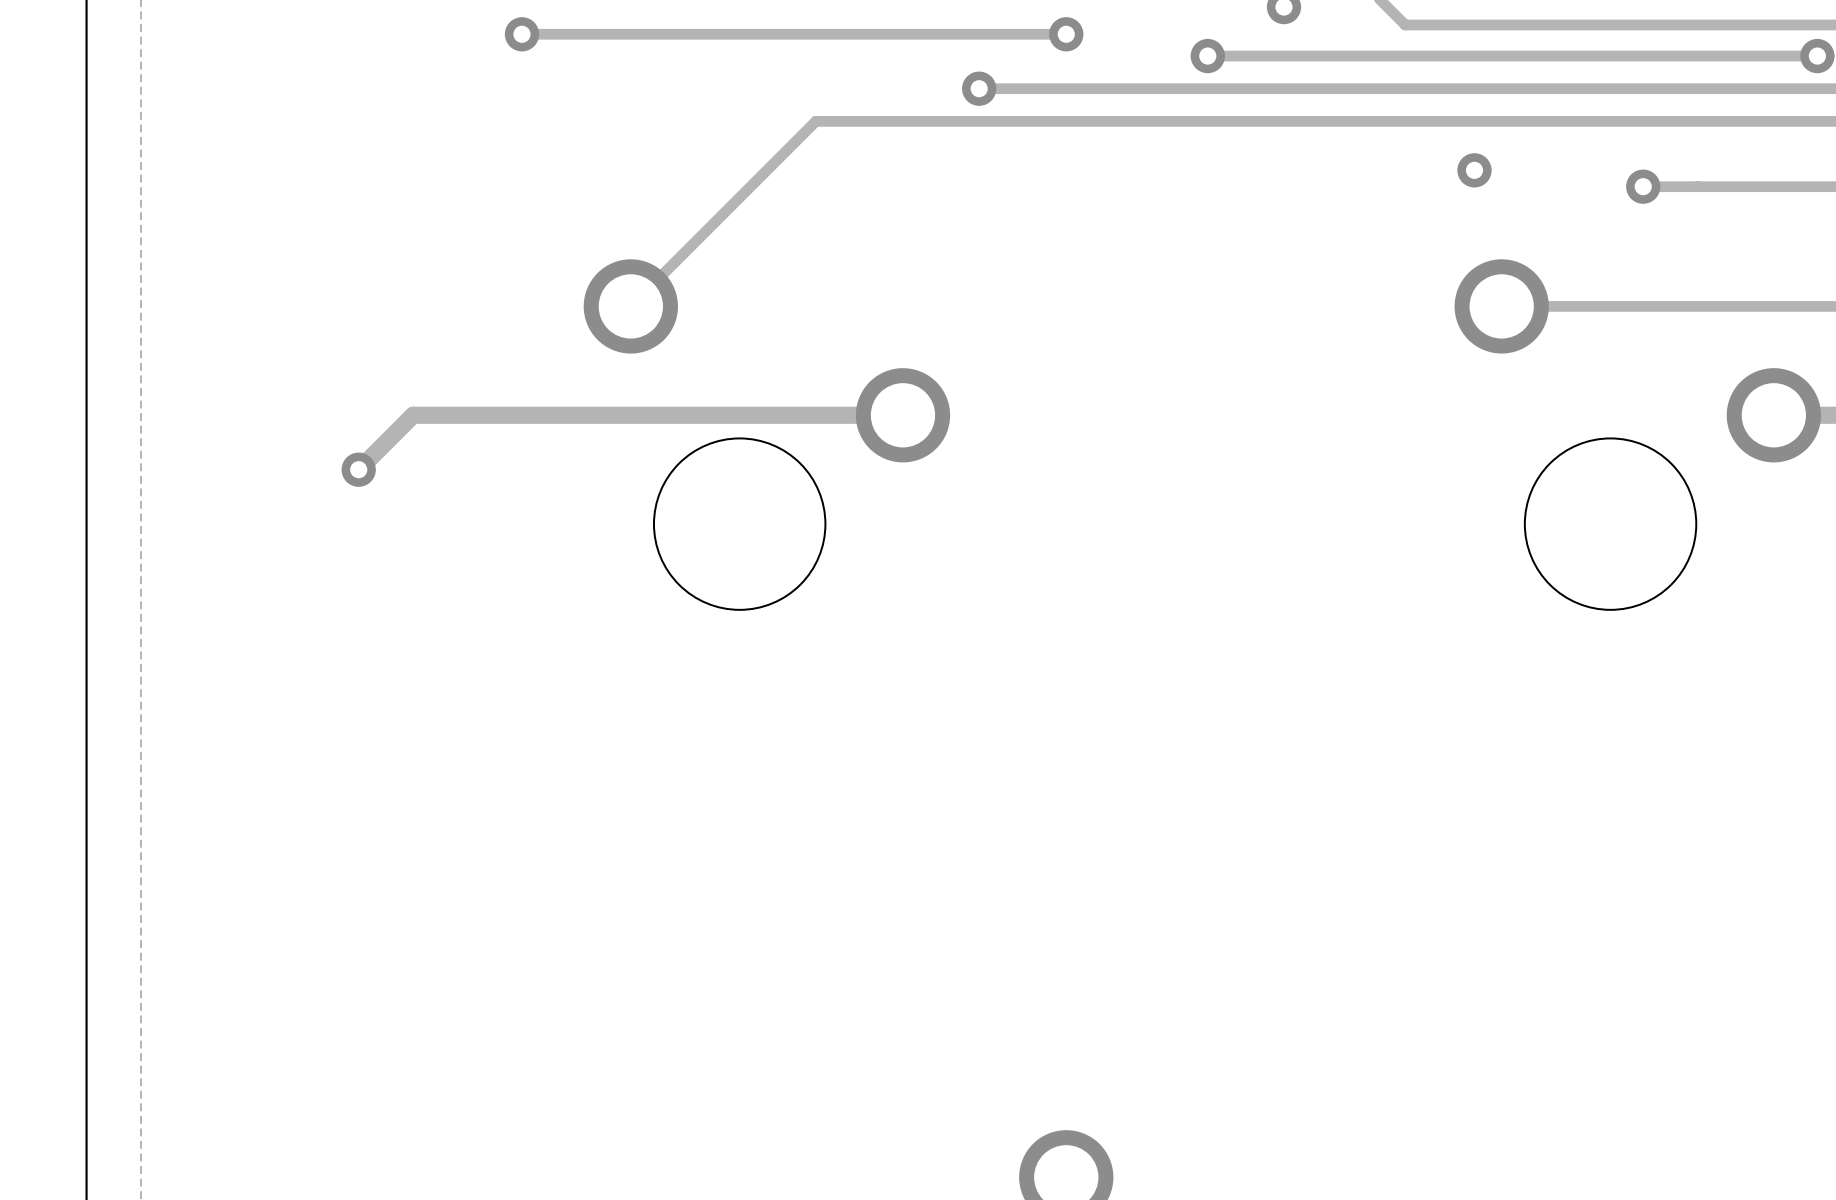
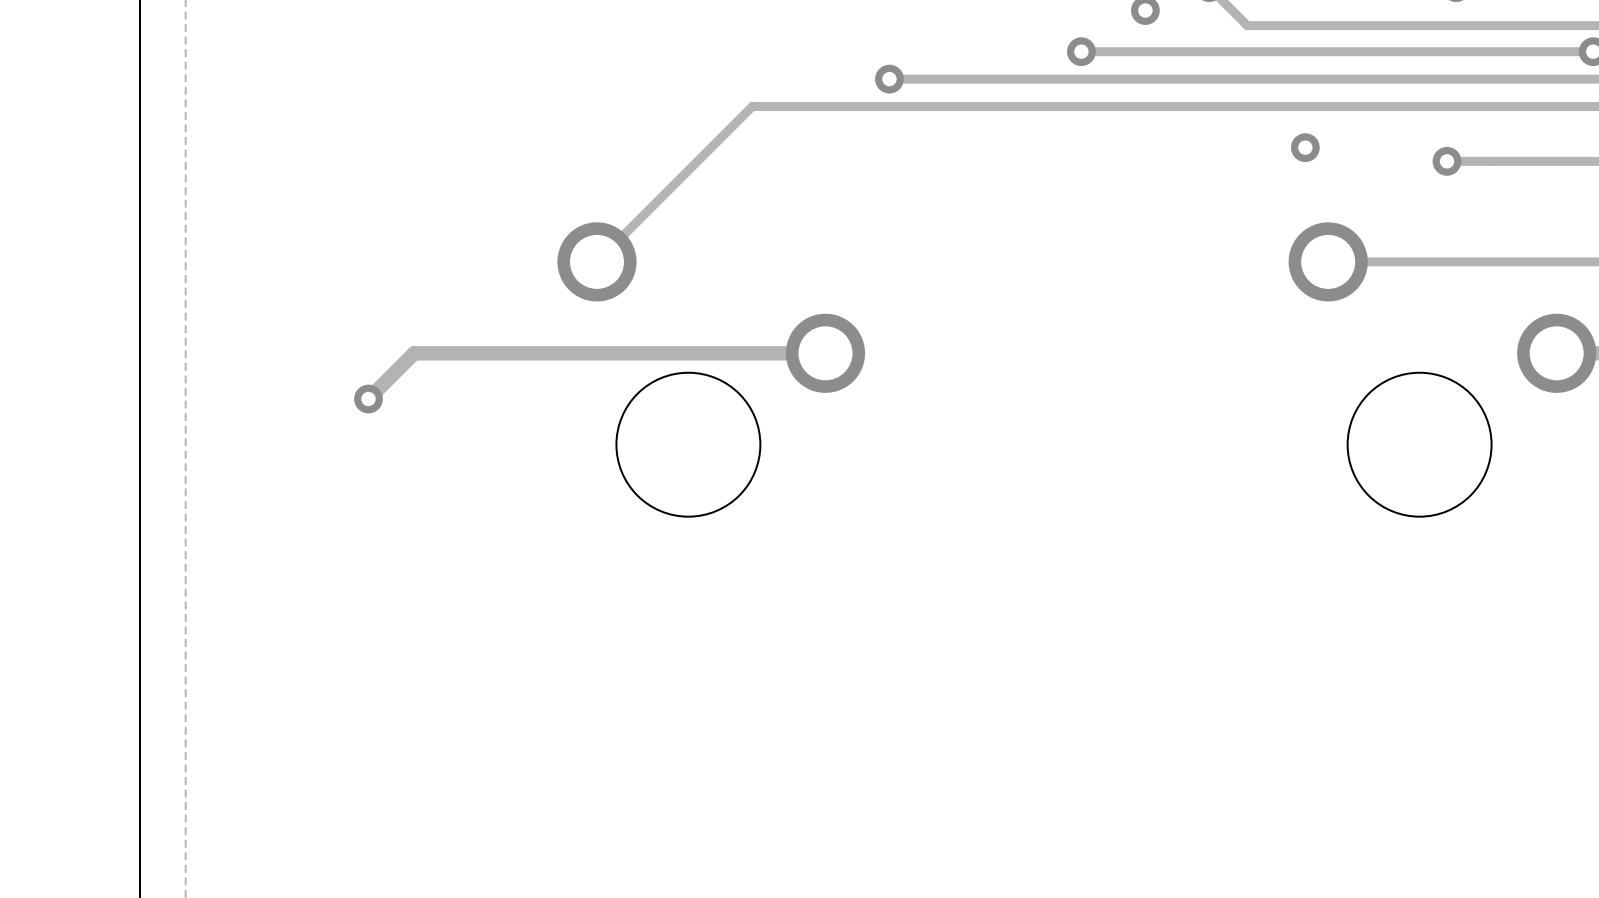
via: (521, 34) -> none
track: (1066, 34) (521, 34) -> none
via: (1066, 34) -> none

